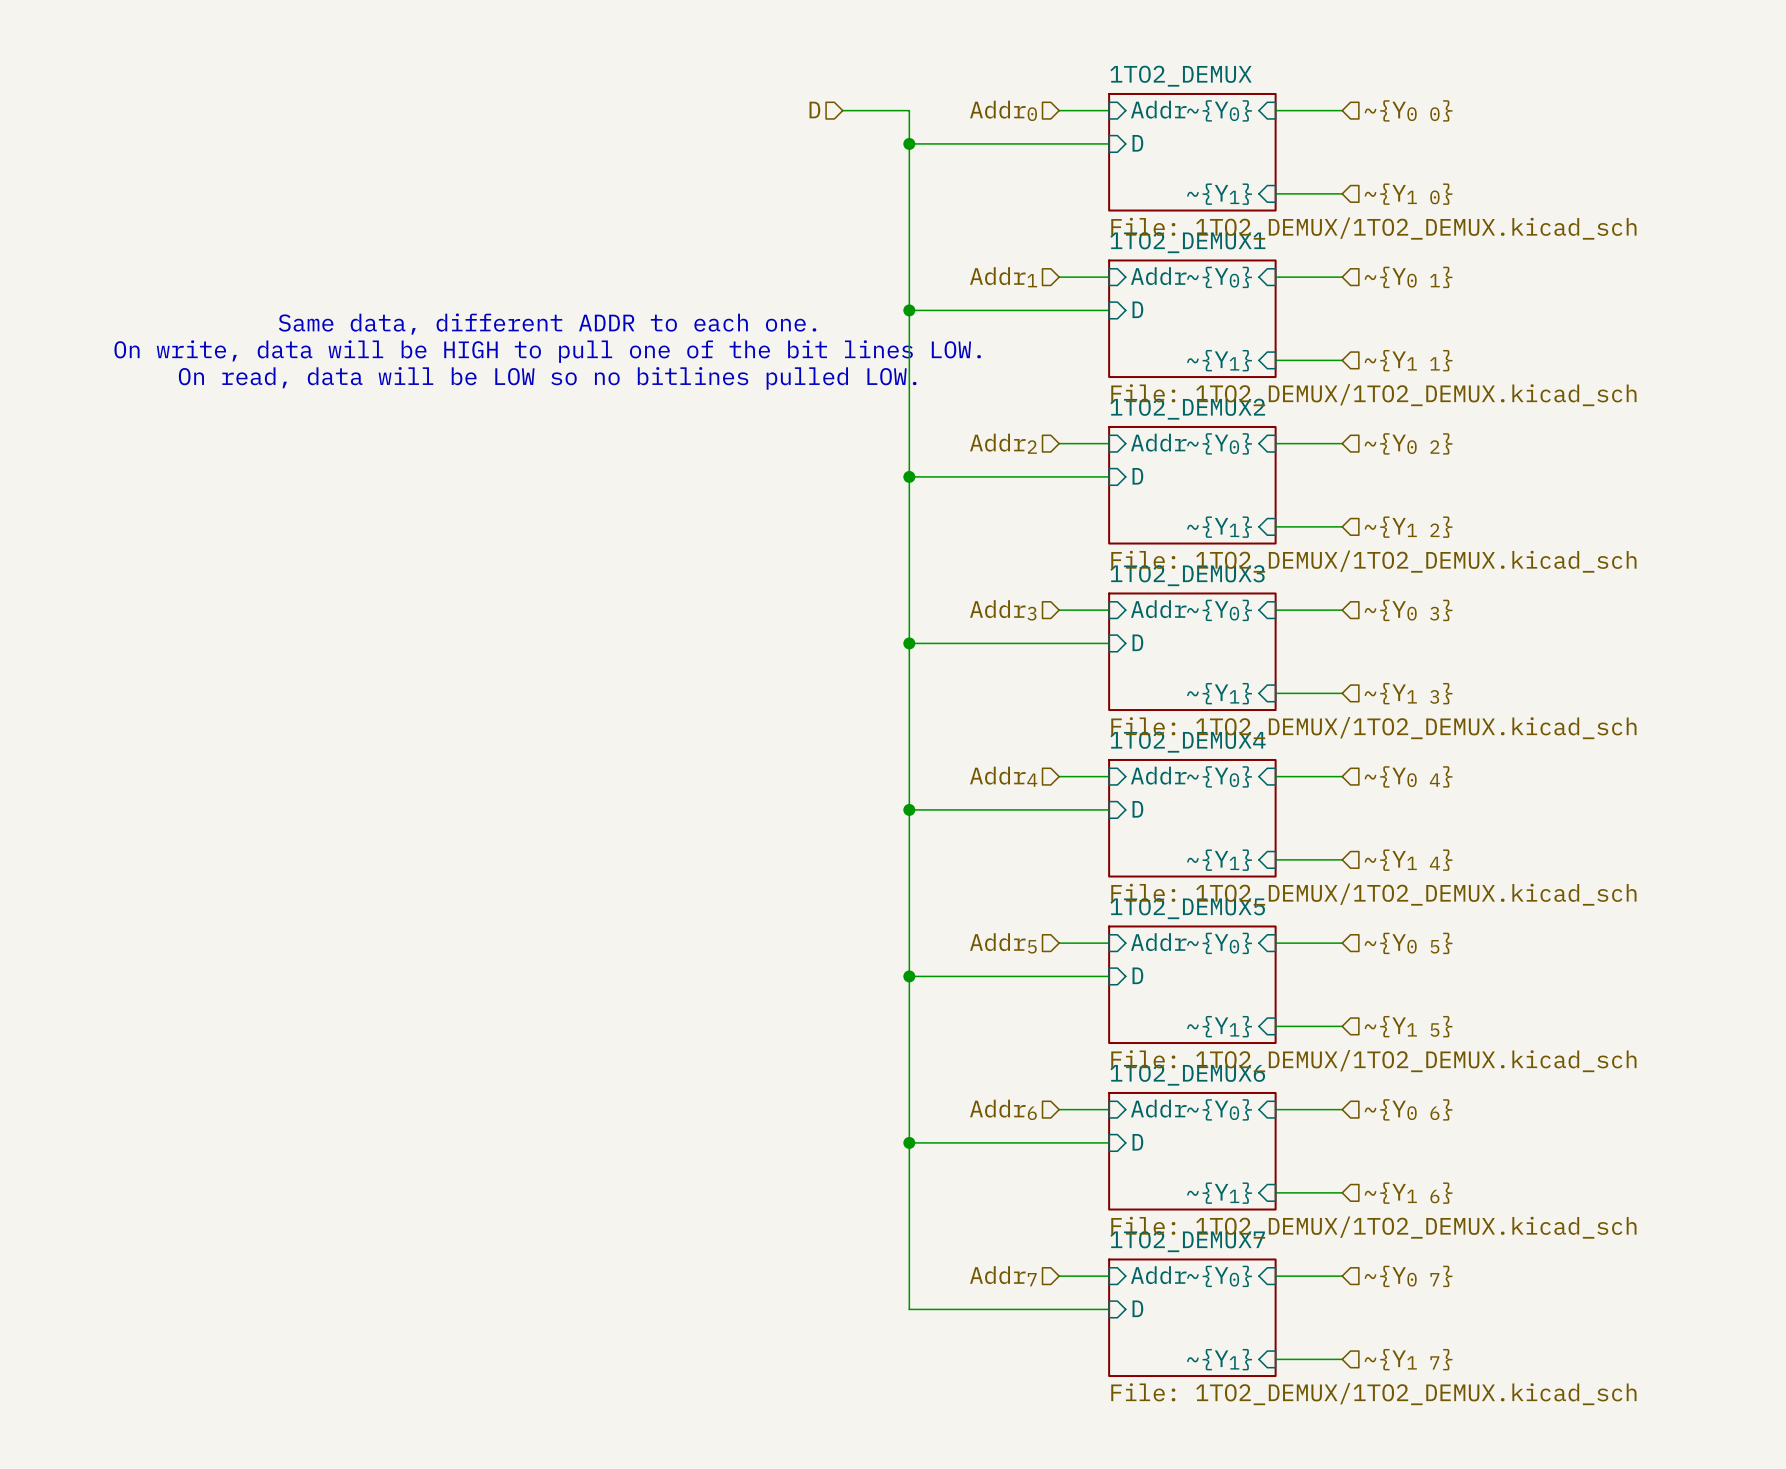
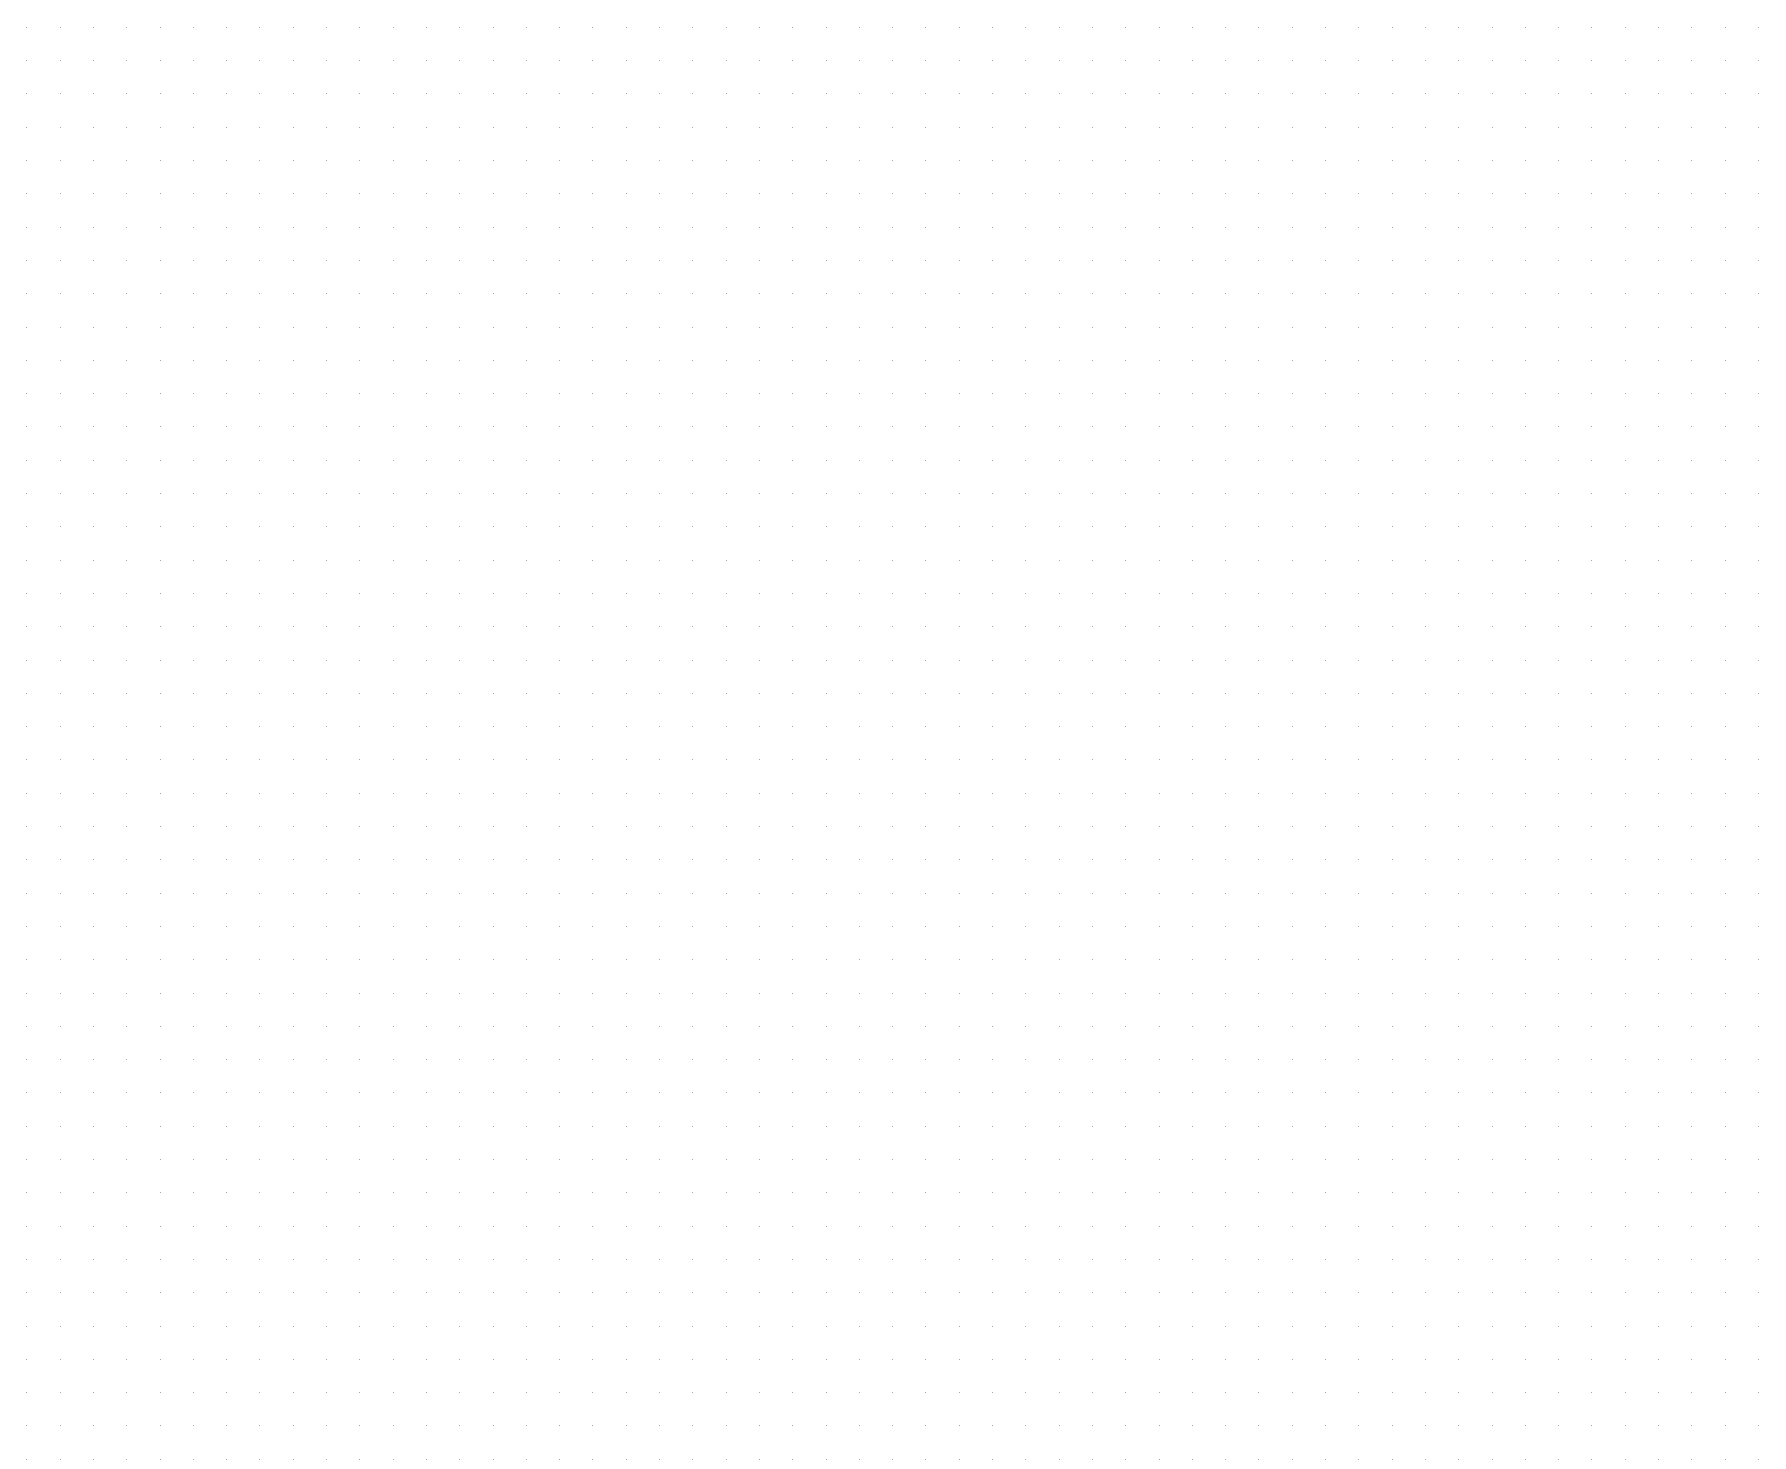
sheet pin: Addr (1158, 109) -> none
hierarchical label: D (814, 110) -> none
wire: (842, 110) (909, 110) (909, 1309) (1109, 1309) -> none
hierarchical label: Addr0 (1003, 110) -> none
wire: (1059, 110) (1109, 110) -> none
sheet pin: ~{Y0} (1219, 110) -> none
wire: (1275, 110) (1342, 110) -> none
hierarchical label: ~{Y0 0} (1408, 110) -> none
wire: (909, 143) (1109, 143) -> none
junction: (909, 143) -> none
sheet pin: D (1137, 143) -> none
sheet 1TO2_DEMUX: File: 1TO2_DEMUX/1TO2_DEMUX.kicad_sch (1192, 152) -> none
wire: (1275, 193) (1342, 193) -> none
sheet pin: ~{Y1} (1219, 194) -> none
hierarchical label: ~{Y1 0} (1408, 194) -> none
sheet pin: Addr (1158, 276) -> none
hierarchical label: Addr1 (1003, 277) -> none
wire: (1059, 277) (1109, 277) -> none
sheet pin: ~{Y0} (1219, 277) -> none
wire: (1275, 277) (1342, 277) -> none
hierarchical label: ~{Y0 1} (1408, 277) -> none
sheet pin: D (1137, 309) -> none
wire: (909, 310) (1109, 310) -> none
junction: (909, 310) -> none
sheet 1TO2_DEMUX1: File: 1TO2_DEMUX/1TO2_DEMUX.kicad_sch (1192, 318) -> none
text: Same data, different ADDR to each one. (547, 324) -> none
text: On write, data will be HIGH to pull one of the bit lines LOW. (547, 351) -> none
sheet pin: ~{Y1} (1219, 360) -> none
wire: (1275, 360) (1342, 360) -> none
hierarchical label: ~{Y1 1} (1408, 360) -> none
text: On read, data will be LOW so no bitlines pulled LOW. (547, 378) -> none
sheet pin: Addr (1158, 442) -> none
hierarchical label: Addr2 (1003, 443) -> none
wire: (1059, 443) (1109, 443) -> none
sheet pin: ~{Y0} (1219, 443) -> none
wire: (1275, 443) (1342, 443) -> none
hierarchical label: ~{Y0 2} (1408, 443) -> none
wire: (909, 476) (1109, 476) -> none
junction: (909, 476) -> none
sheet pin: D (1137, 476) -> none
sheet 1TO2_DEMUX2: File: 1TO2_DEMUX/1TO2_DEMUX.kicad_sch (1192, 485) -> none
wire: (1275, 526) (1342, 526) -> none
sheet pin: ~{Y1} (1219, 527) -> none
hierarchical label: ~{Y1 2} (1408, 527) -> none
sheet pin: Addr (1158, 609) -> none
hierarchical label: Addr3 (1003, 610) -> none
wire: (1059, 610) (1109, 610) -> none
sheet pin: ~{Y0} (1219, 610) -> none
wire: (1275, 610) (1342, 610) -> none
hierarchical label: ~{Y0 3} (1408, 610) -> none
sheet pin: D (1137, 642) -> none
wire: (909, 643) (1109, 643) -> none
junction: (909, 643) -> none
sheet 1TO2_DEMUX3: File: 1TO2_DEMUX/1TO2_DEMUX.kicad_sch (1192, 651) -> none
sheet pin: ~{Y1} (1219, 693) -> none
wire: (1275, 693) (1342, 693) -> none
hierarchical label: ~{Y1 3} (1408, 693) -> none
sheet pin: Addr (1158, 775) -> none
hierarchical label: Addr4 (1003, 776) -> none
wire: (1059, 776) (1109, 776) -> none
sheet pin: ~{Y0} (1219, 776) -> none
wire: (1275, 776) (1342, 776) -> none
hierarchical label: ~{Y0 4} (1408, 776) -> none
wire: (909, 809) (1109, 809) -> none
junction: (909, 809) -> none
sheet pin: D (1137, 809) -> none
sheet 1TO2_DEMUX4: File: 1TO2_DEMUX/1TO2_DEMUX.kicad_sch (1192, 818) -> none
wire: (1275, 859) (1342, 859) -> none
sheet pin: ~{Y1} (1219, 860) -> none
hierarchical label: ~{Y1 4} (1408, 860) -> none
sheet pin: Addr (1158, 942) -> none
hierarchical label: Addr5 (1003, 943) -> none
wire: (1059, 943) (1109, 943) -> none
sheet pin: ~{Y0} (1219, 943) -> none
wire: (1275, 943) (1342, 943) -> none
hierarchical label: ~{Y0 5} (1408, 943) -> none
sheet pin: D (1137, 975) -> none
wire: (909, 976) (1109, 976) -> none
junction: (909, 976) -> none
sheet 1TO2_DEMUX5: File: 1TO2_DEMUX/1TO2_DEMUX.kicad_sch (1192, 984) -> none
sheet pin: ~{Y1} (1219, 1026) -> none
wire: (1275, 1026) (1342, 1026) -> none
hierarchical label: ~{Y1 5} (1408, 1026) -> none
sheet pin: Addr (1158, 1108) -> none
hierarchical label: Addr6 (1003, 1109) -> none
wire: (1059, 1109) (1109, 1109) -> none
sheet pin: ~{Y0} (1219, 1109) -> none
wire: (1275, 1109) (1342, 1109) -> none
hierarchical label: ~{Y0 6} (1408, 1109) -> none
wire: (909, 1142) (1109, 1142) -> none
junction: (909, 1142) -> none
sheet pin: D (1137, 1142) -> none
sheet 1TO2_DEMUX6: File: 1TO2_DEMUX/1TO2_DEMUX.kicad_sch (1192, 1151) -> none
wire: (1275, 1192) (1342, 1192) -> none
sheet pin: ~{Y1} (1219, 1193) -> none
hierarchical label: ~{Y1 6} (1408, 1193) -> none
sheet pin: Addr (1158, 1275) -> none
hierarchical label: Addr7 (1003, 1276) -> none
wire: (1059, 1276) (1109, 1276) -> none
sheet pin: ~{Y0} (1219, 1276) -> none
wire: (1275, 1276) (1342, 1276) -> none
hierarchical label: ~{Y0 7} (1408, 1276) -> none
sheet pin: D (1137, 1308) -> none
sheet 1TO2_DEMUX7: File: 1TO2_DEMUX/1TO2_DEMUX.kicad_sch (1192, 1317) -> none
sheet pin: ~{Y1} (1219, 1359) -> none
wire: (1275, 1359) (1342, 1359) -> none
hierarchical label: ~{Y1 7} (1408, 1359) -> none

